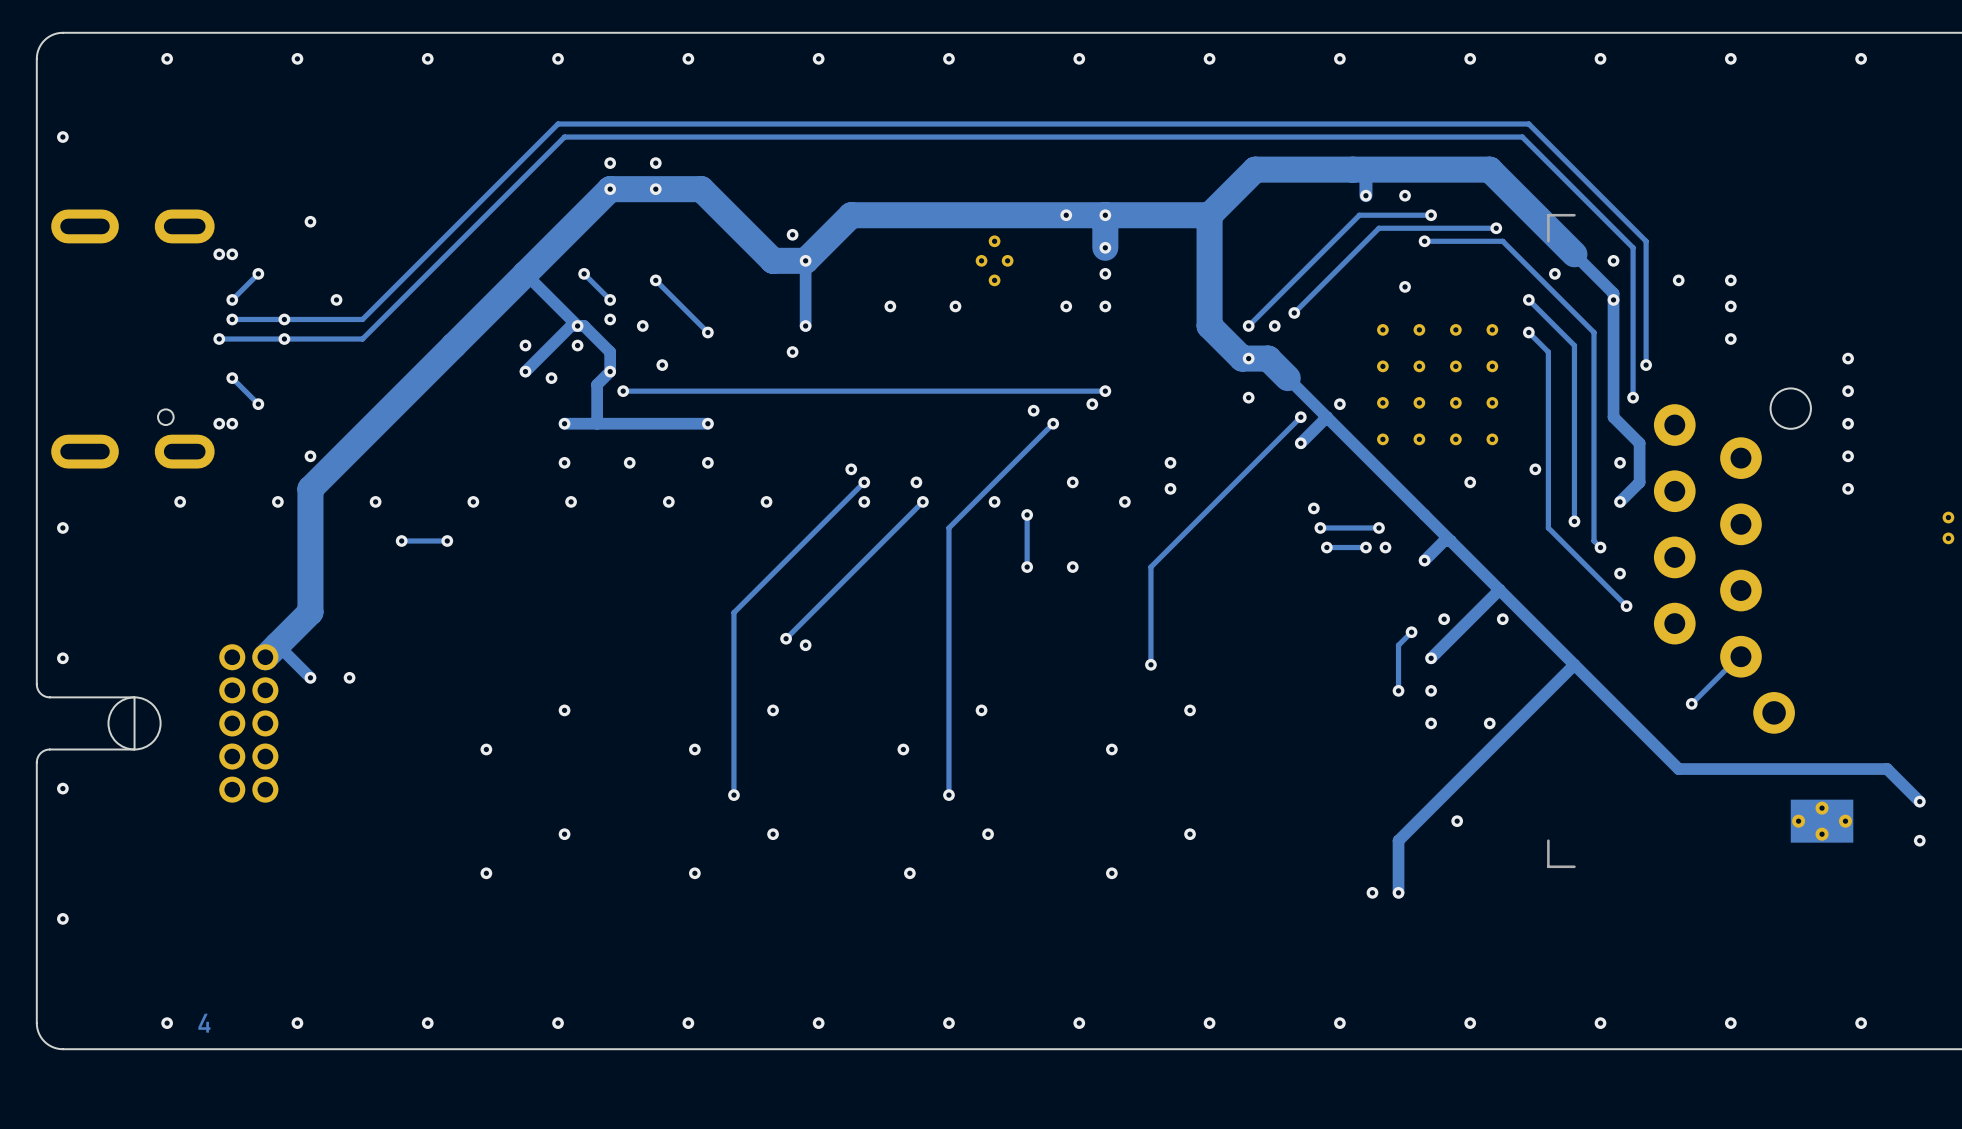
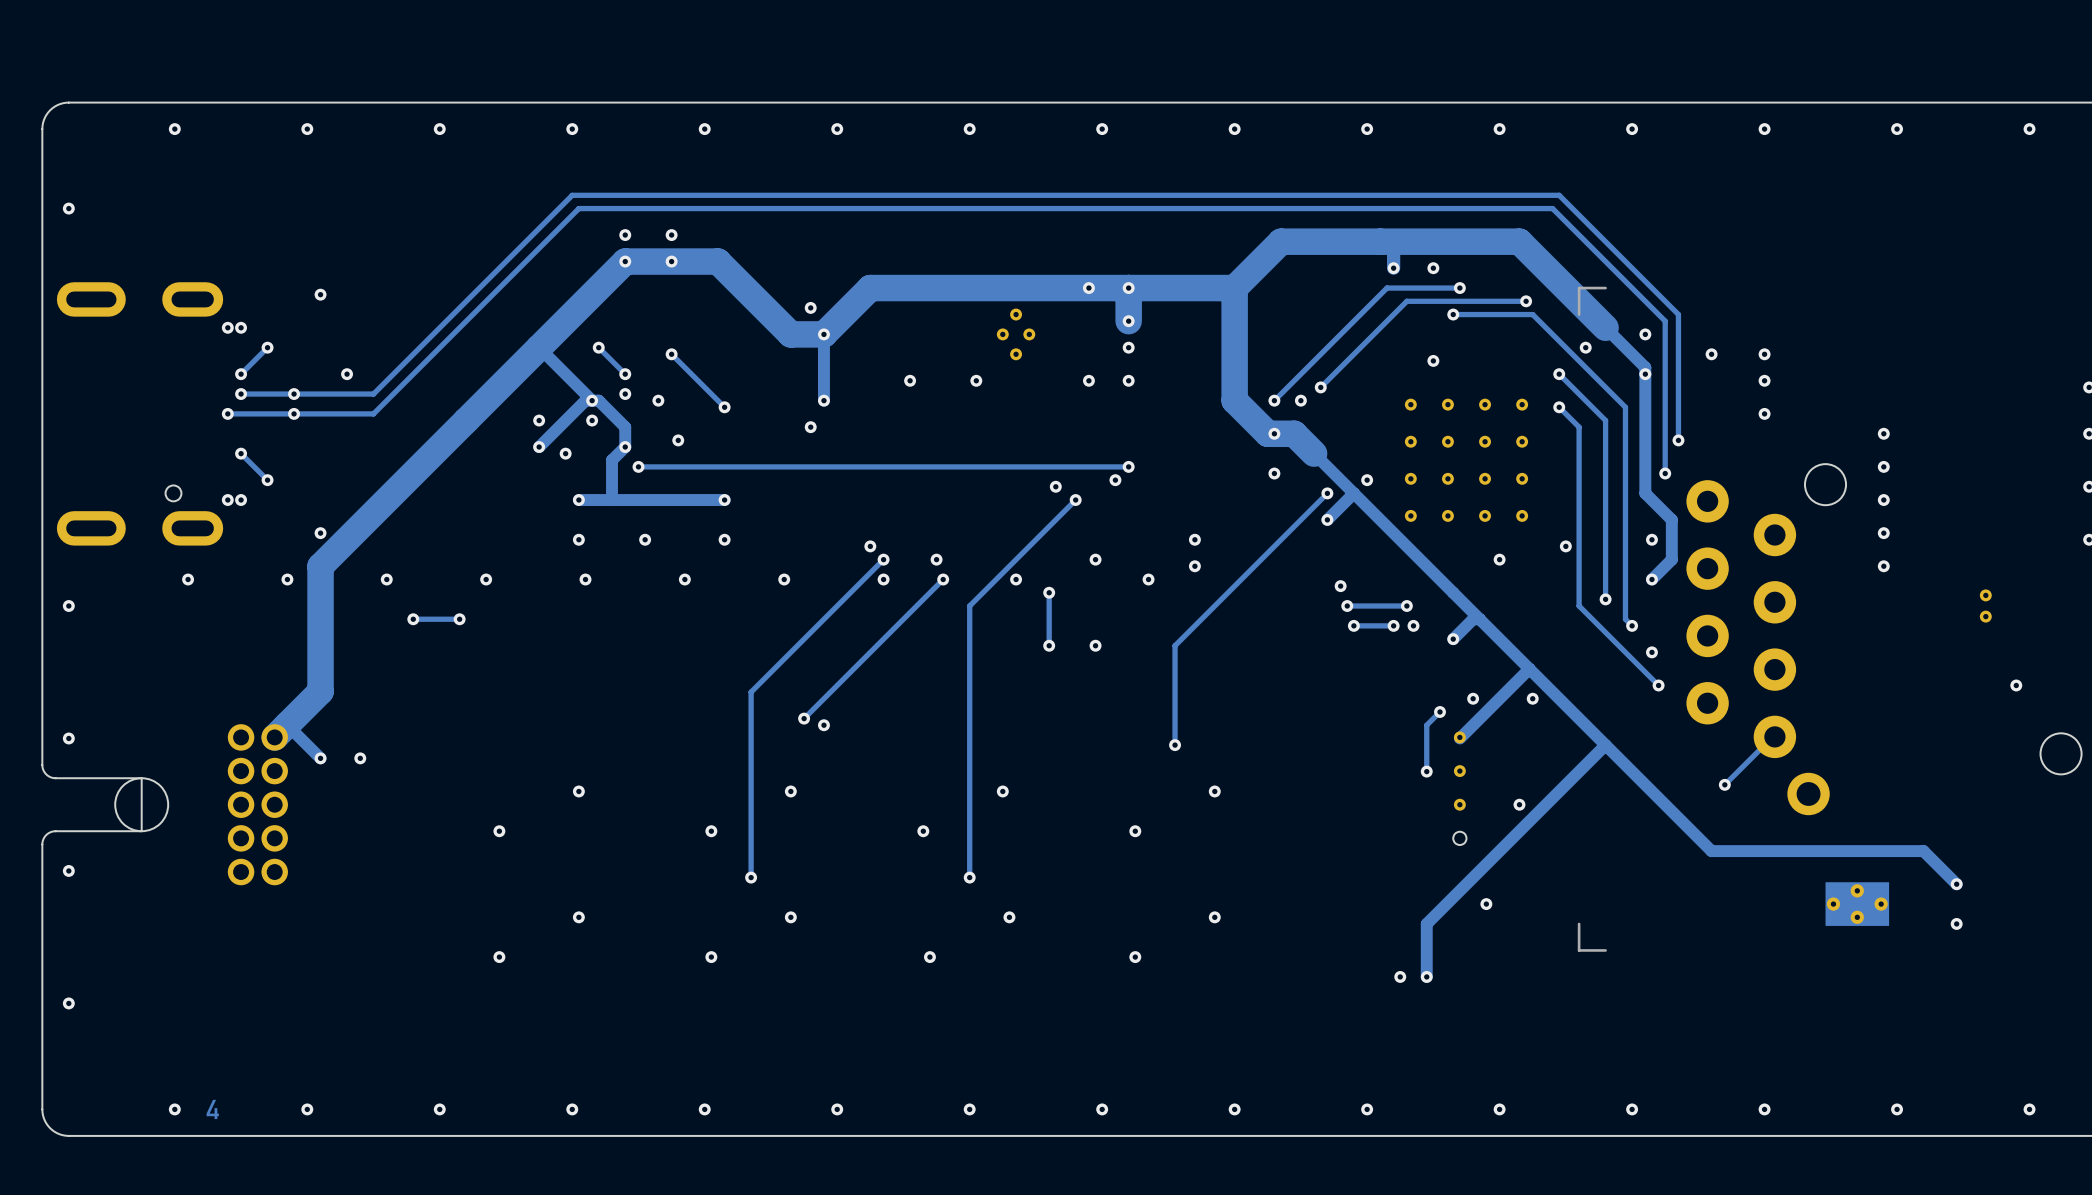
via: (1431, 658) -> none
via: (1431, 690) -> none
part: none -> (1459, 788)
via: (1431, 723) -> none

